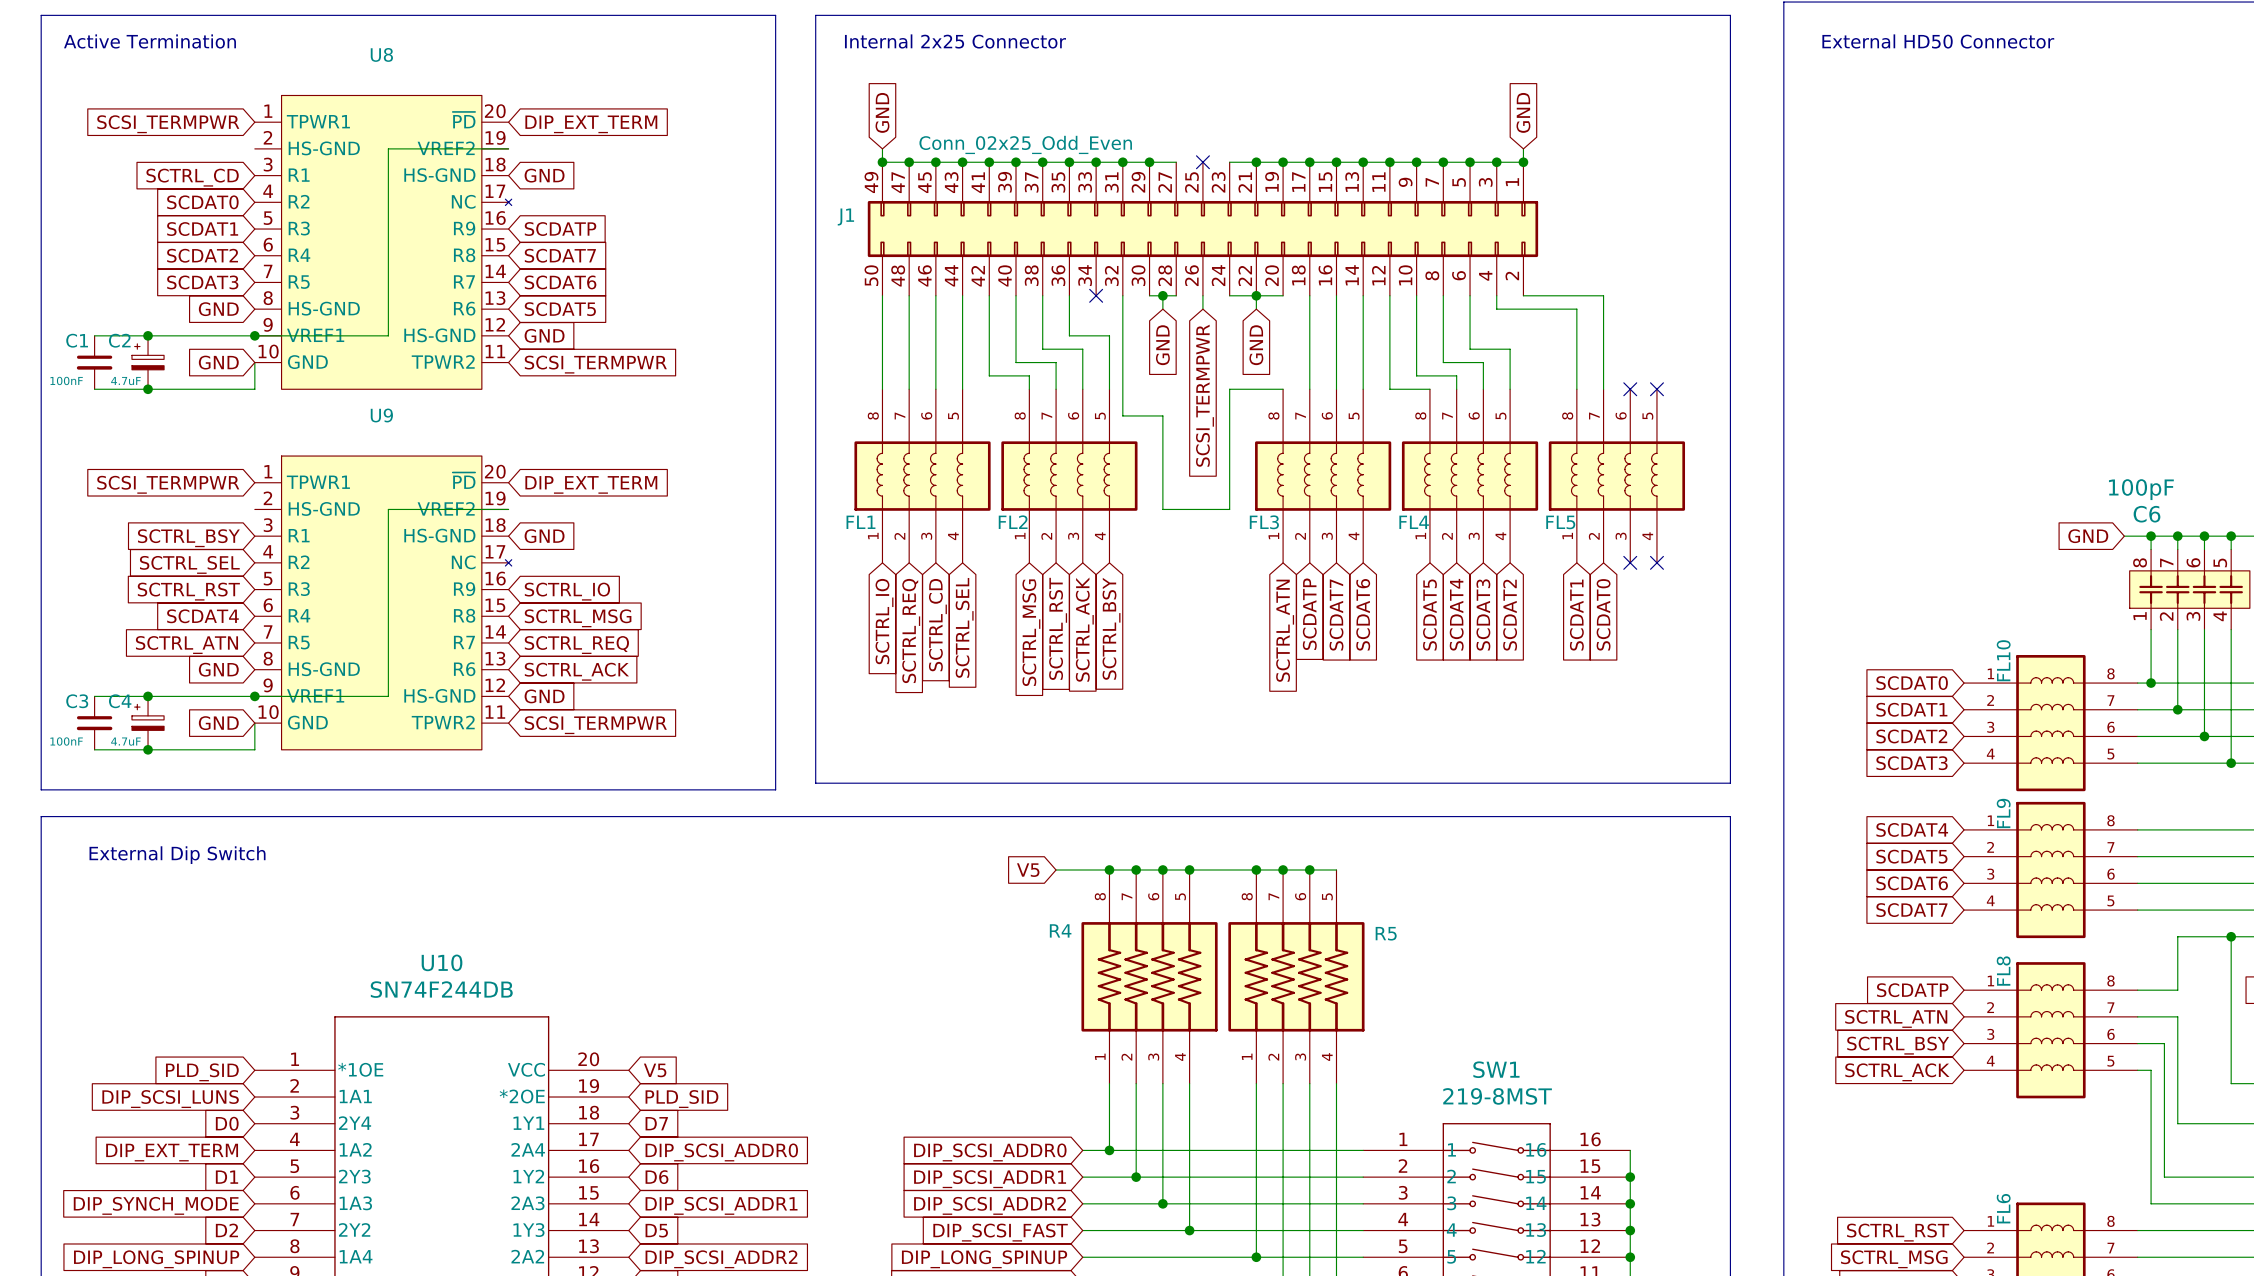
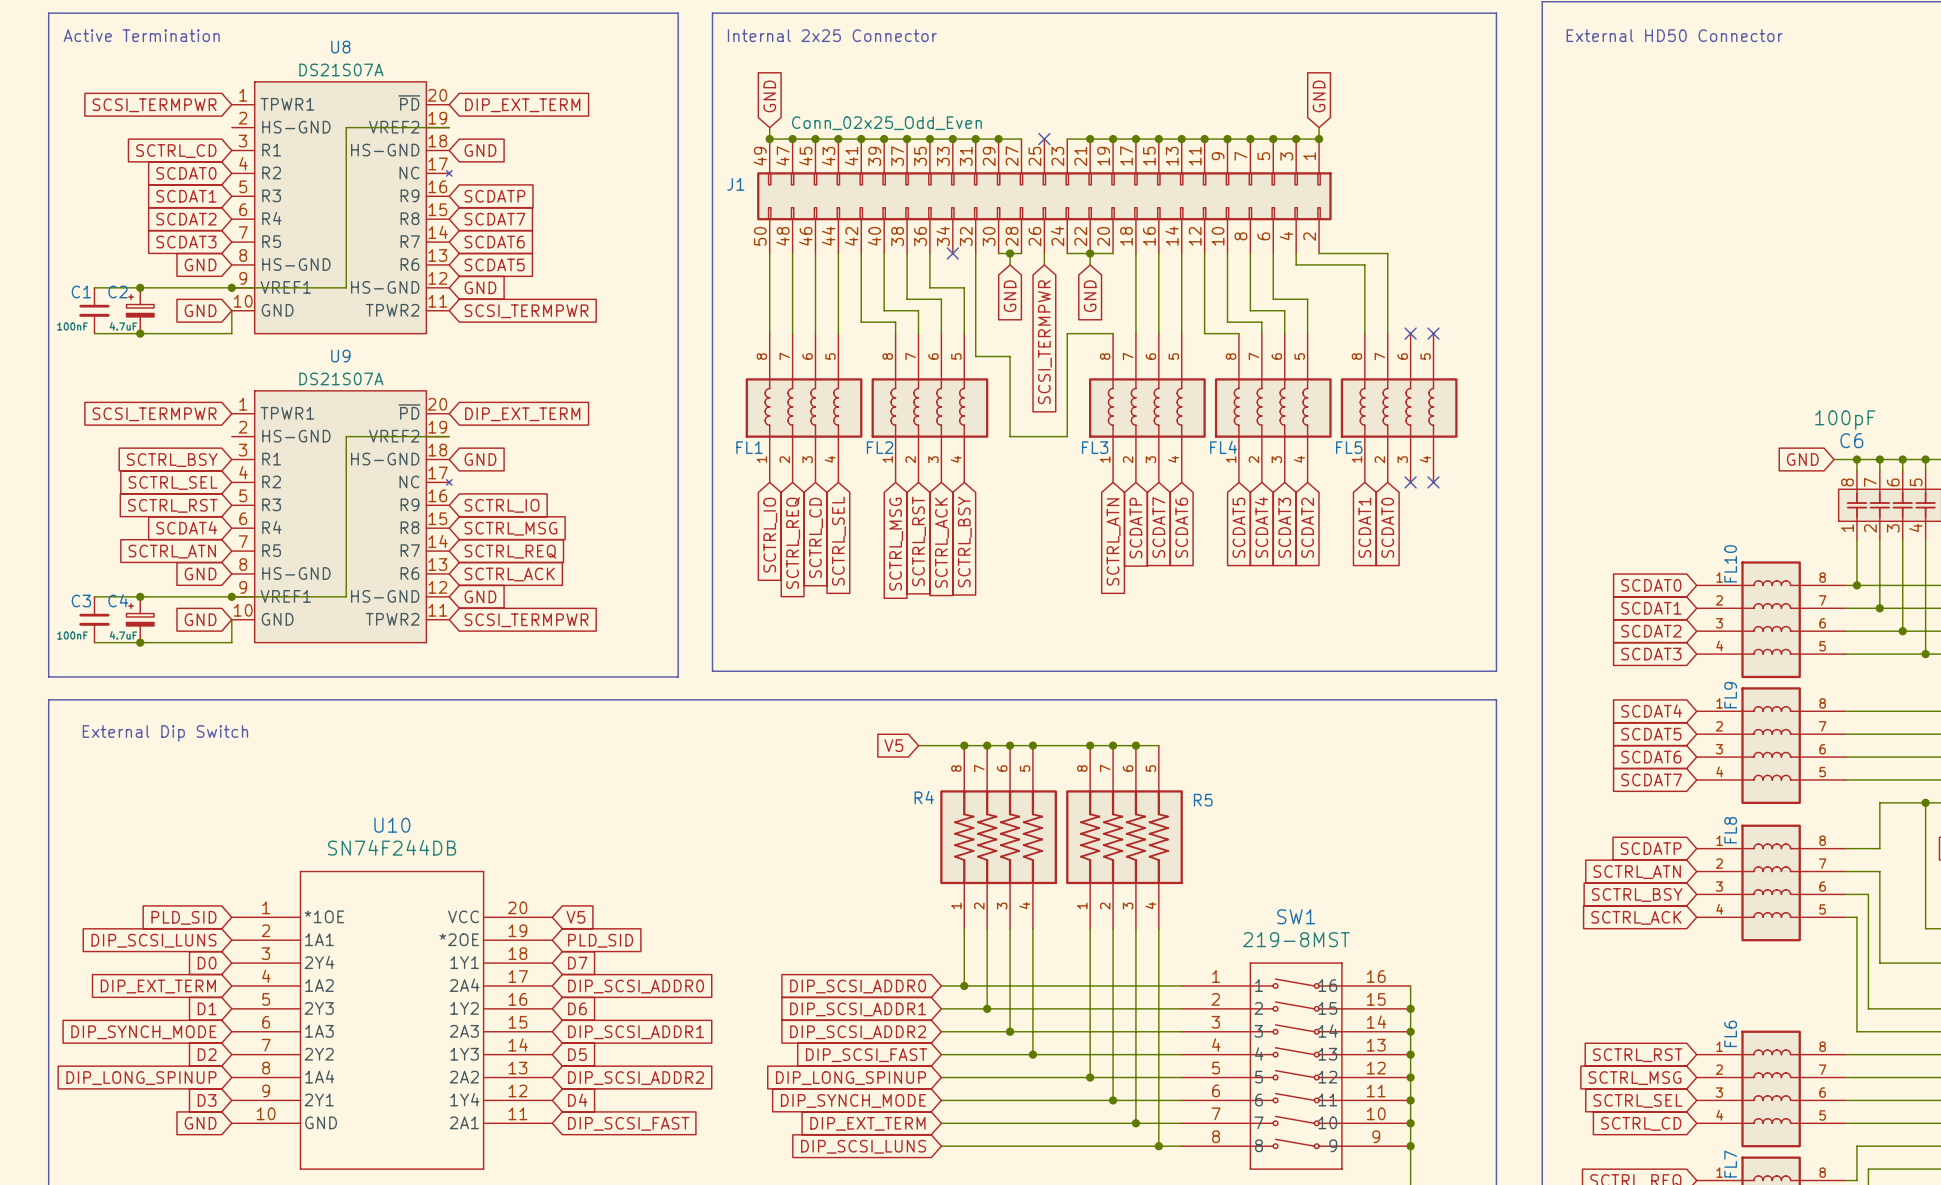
U8 value: none -> DS21S07A (341, 69)
U9 value: none -> DS21S07A (341, 378)

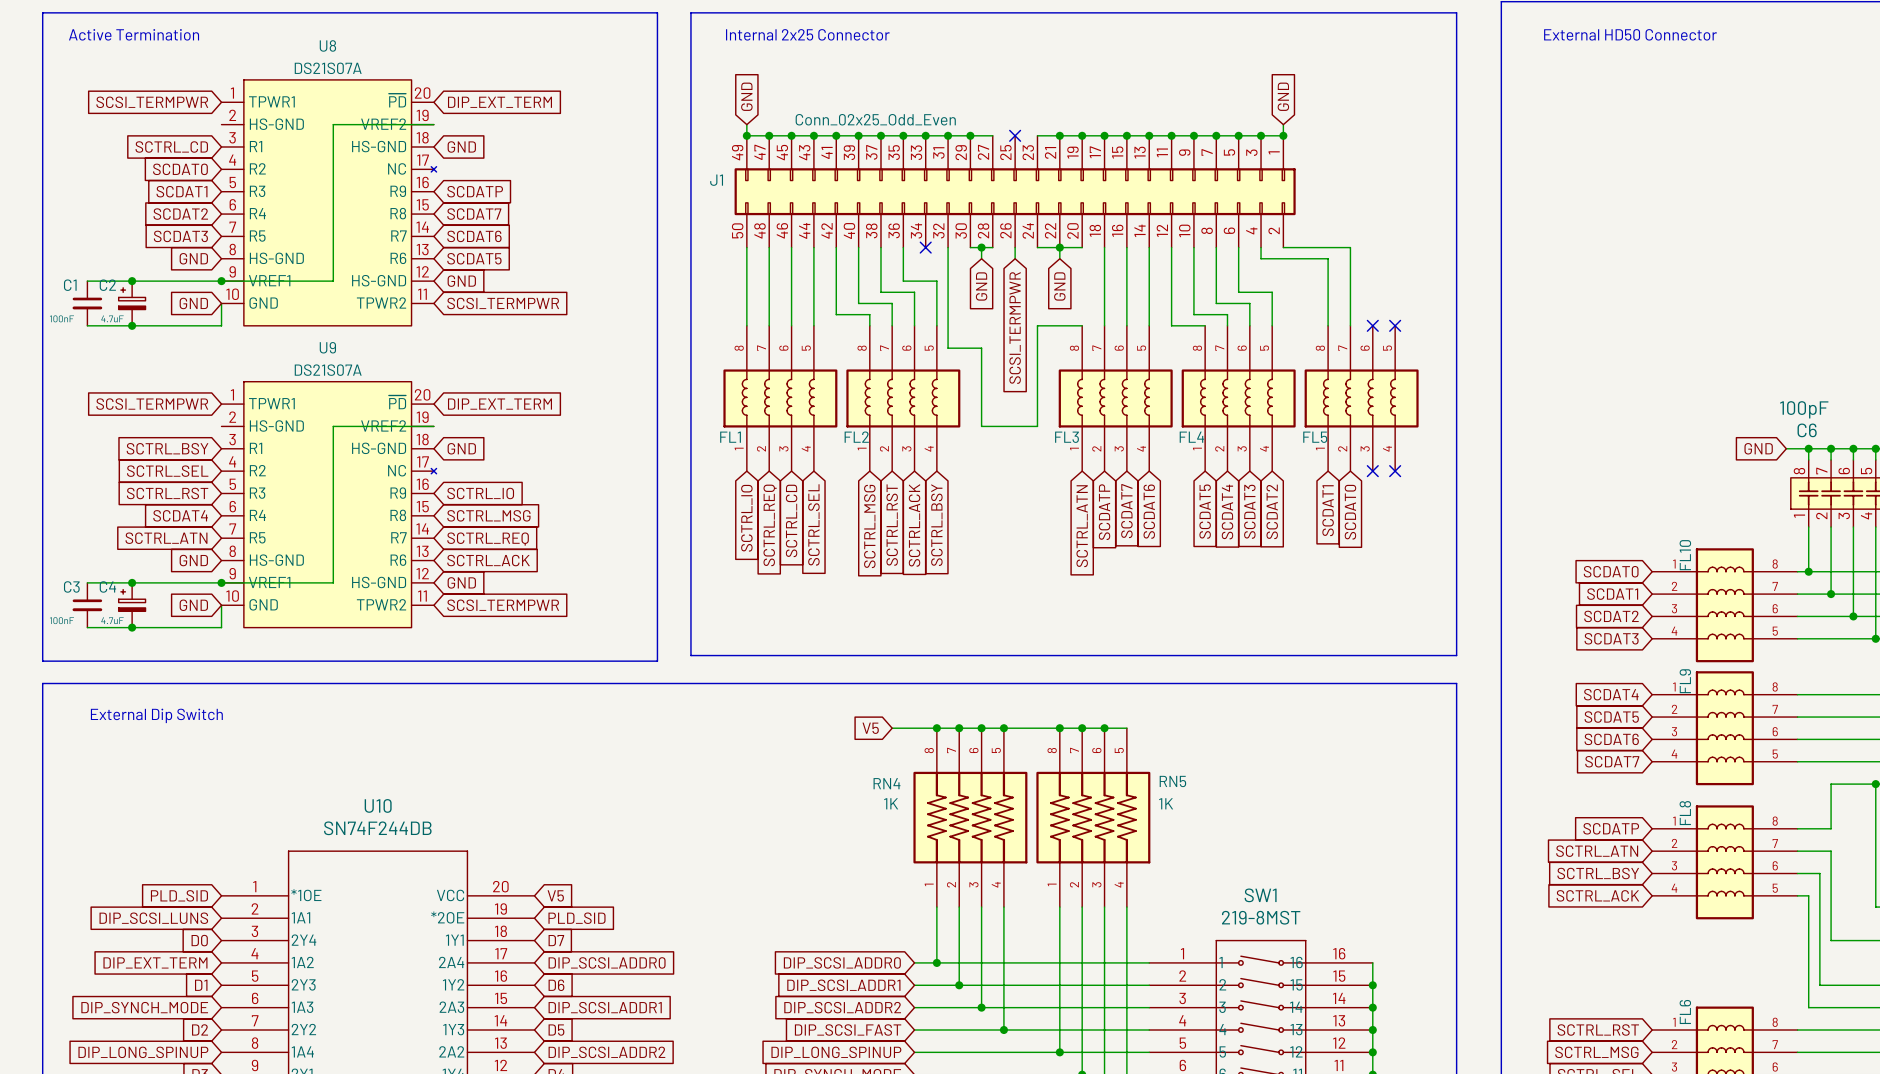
R4 name: R4 (924, 797) -> RN4 (886, 783)
R5 name: R5 (1203, 800) -> RN5 (1172, 781)
R4 value: none -> 1K (891, 803)
R5 value: none -> 1K (1166, 803)

